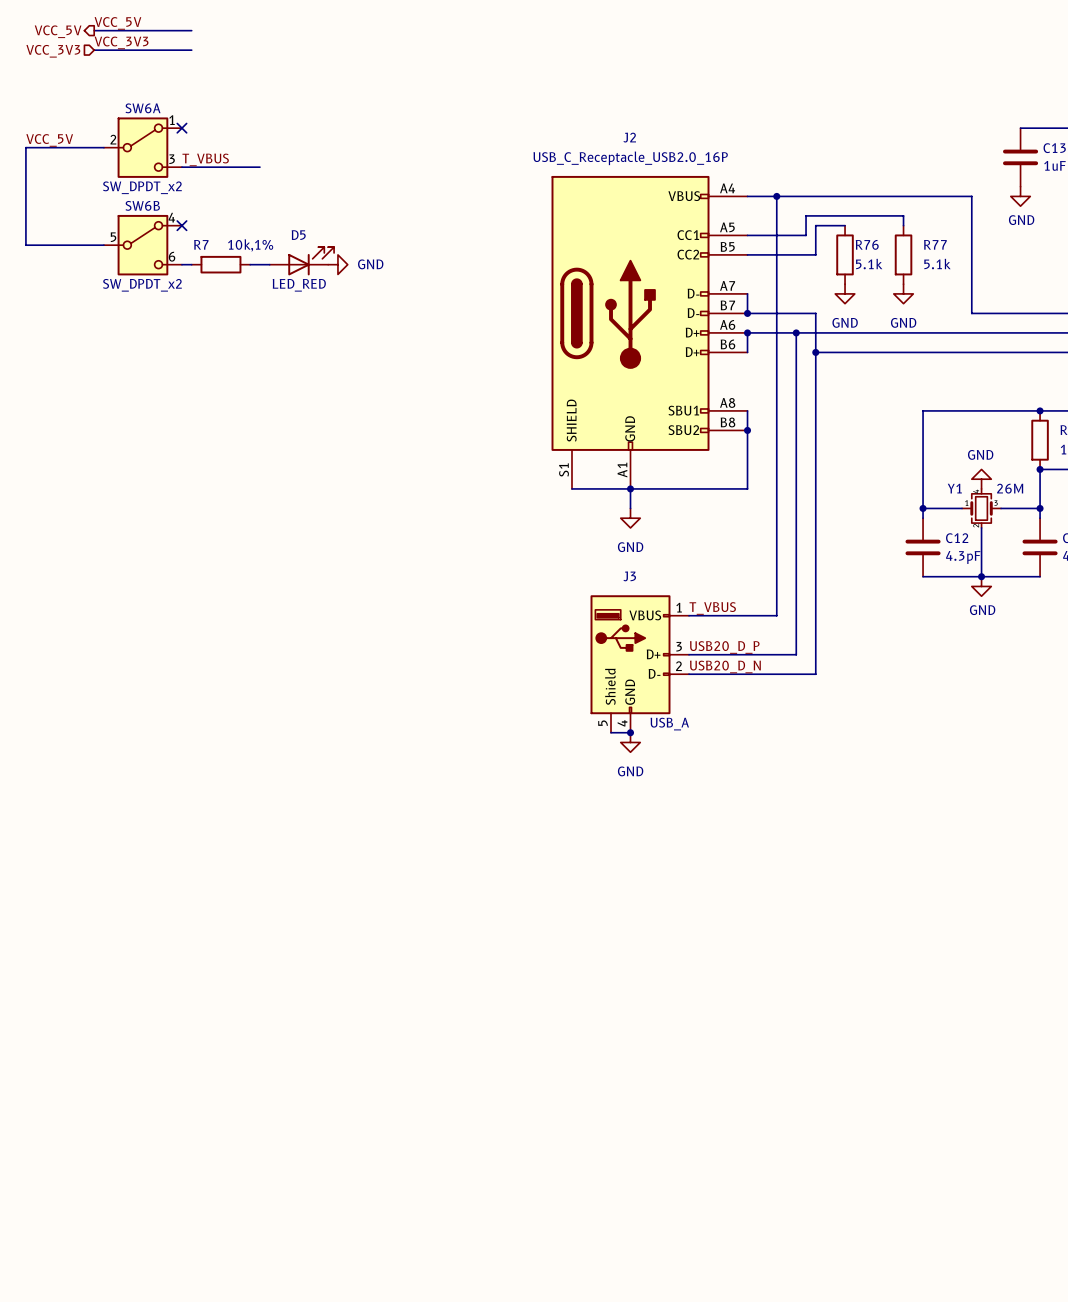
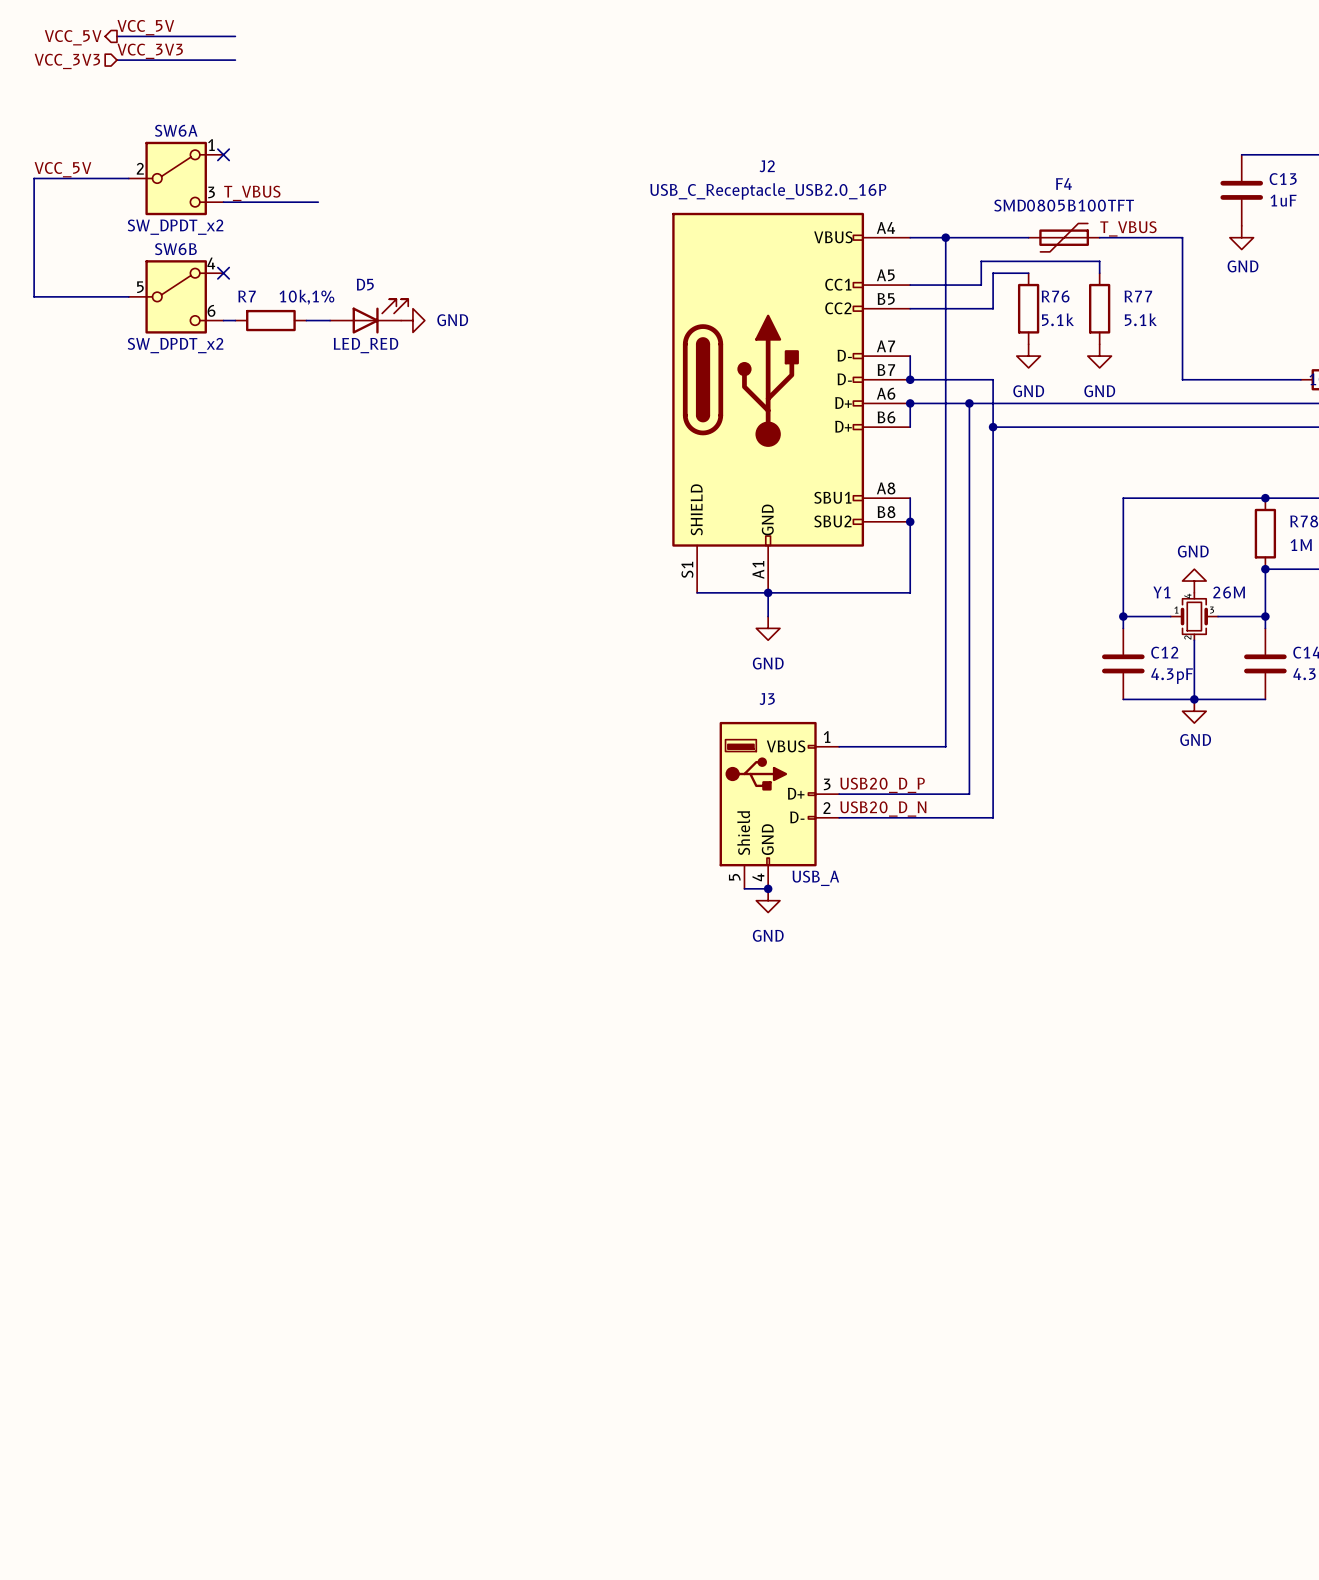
label: none -> T_VBUS (1128, 228)
F4: none -> SMD0805B100TFT (1064, 237)
label: T_VBUS (712, 608) -> none

